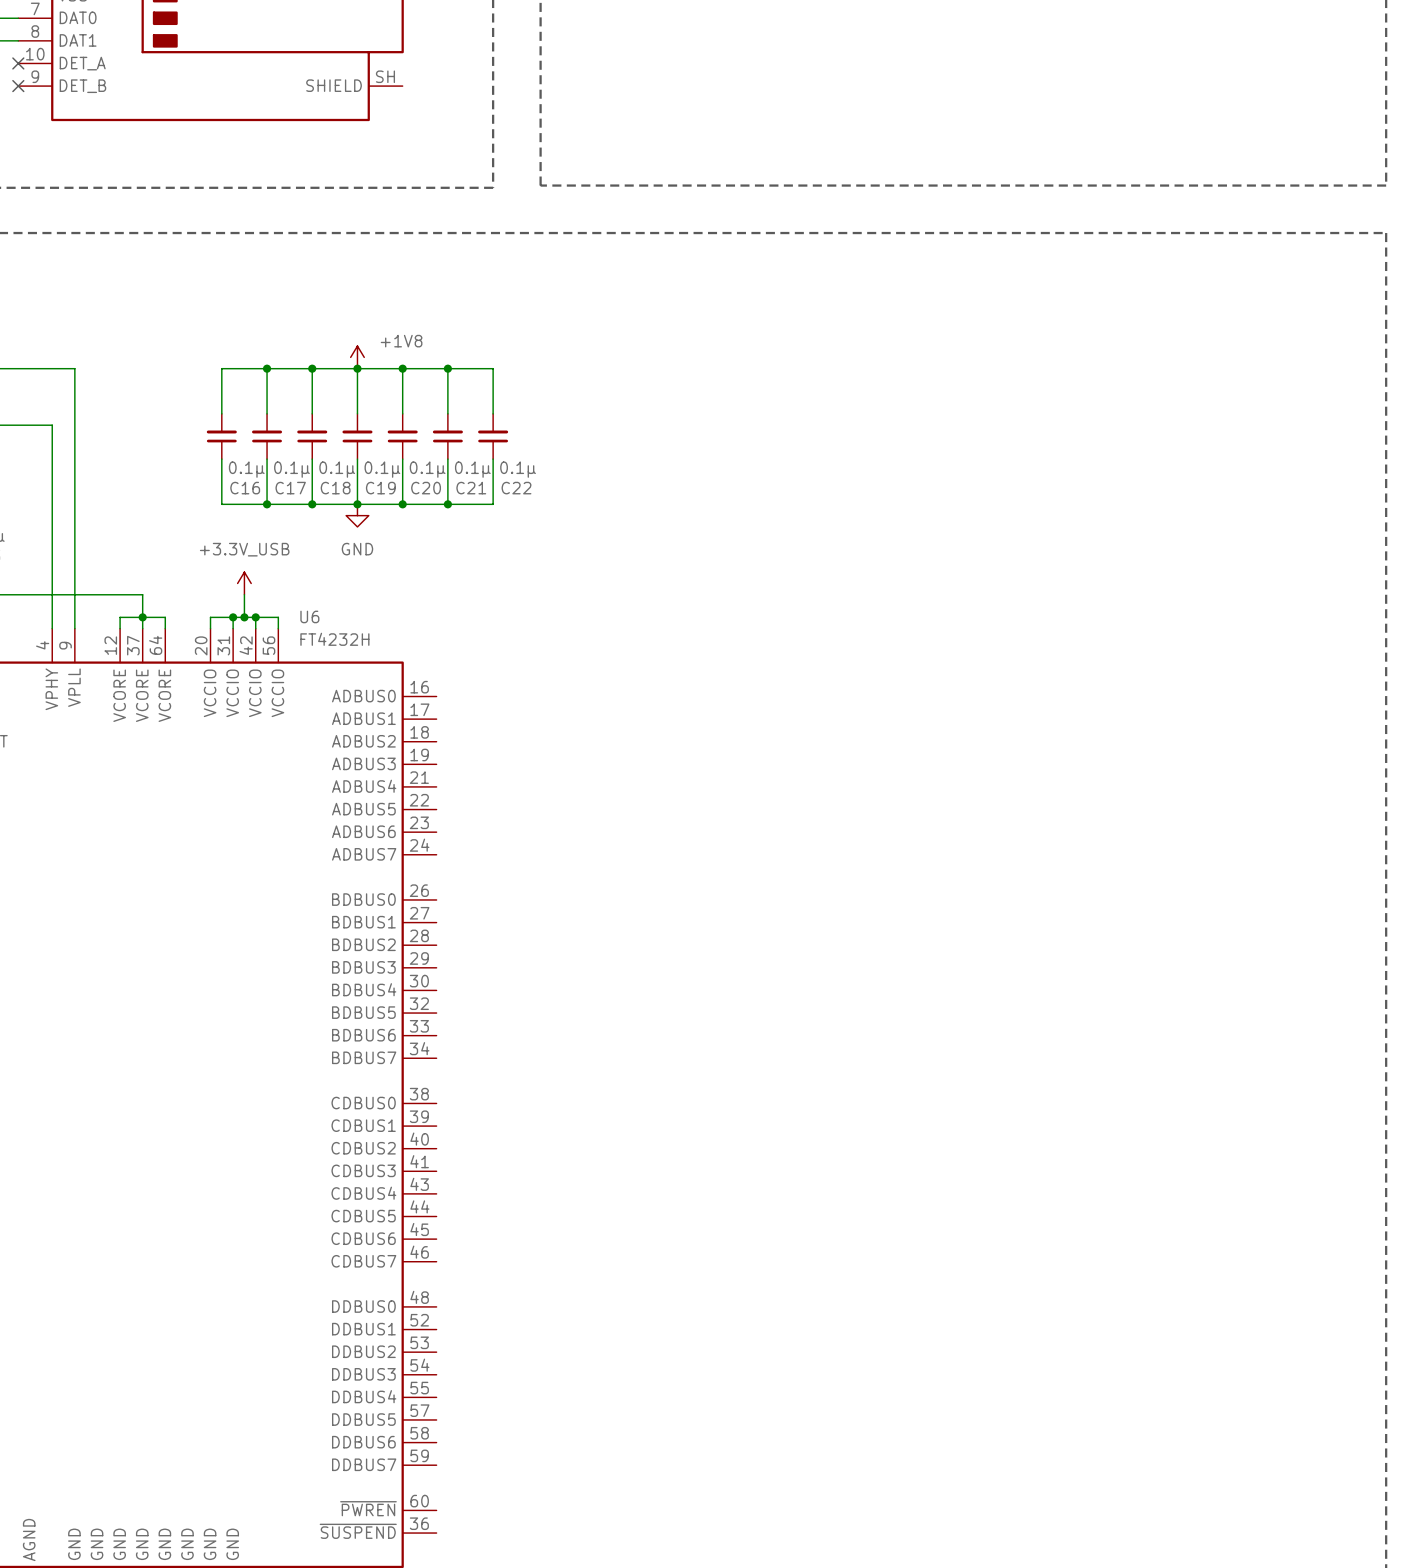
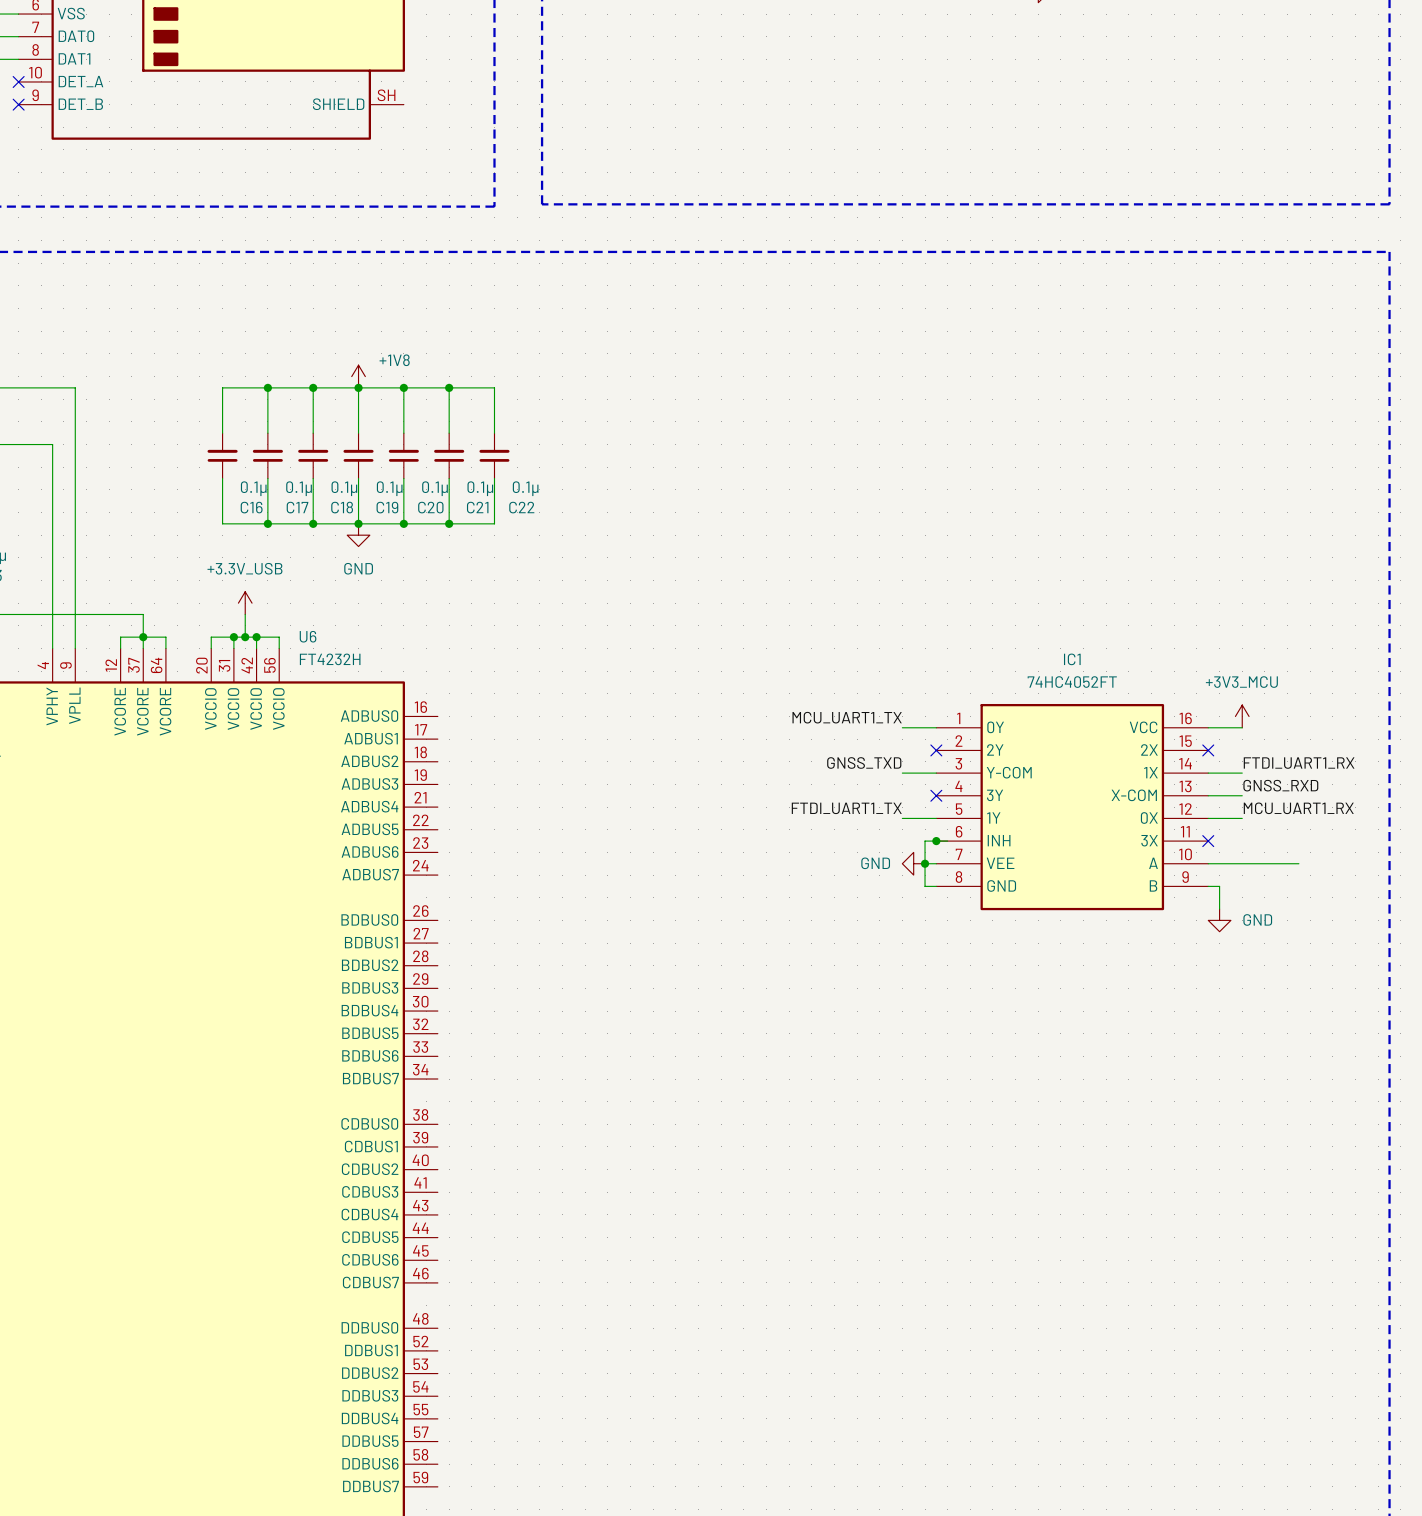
power symbol: none -> +3V3_MCU (1242, 716)
label: none -> MCU_UART1_TX (847, 717)
wire: none -> (902, 727) (936, 727)
wire: none -> (1208, 727) (1242, 727)
no-connect mark: none -> (936, 750)
no-connect mark: none -> (1208, 750)
label: none -> GNSS_TXD (864, 762)
label: none -> FTDI_UART1_RX (1299, 763)
wire: none -> (902, 773) (936, 773)
wire: none -> (1208, 773) (1242, 773)
label: none -> GNSS_RXD (1280, 785)
no-connect mark: none -> (936, 795)
wire: none -> (1208, 795) (1242, 795)
IC1: none -> 74HC4052FT (1072, 807)
label: none -> FTDI_UART1_TX (846, 808)
label: none -> MCU_UART1_RX (1298, 808)
wire: none -> (902, 818) (936, 818)
wire: none -> (1208, 818) (1242, 818)
junction: none -> (936, 841)
wire: none -> (947, 841) (925, 841) (925, 886) (936, 886)
no-connect mark: none -> (1208, 841)
power symbol: none -> GND (913, 863)
wire: none -> (925, 863) (936, 863)
junction: none -> (925, 863)
wire: none -> (1208, 863) (1298, 863)
wire: none -> (1208, 886) (1219, 886) (1219, 909)
power symbol: none -> GND (1219, 920)

